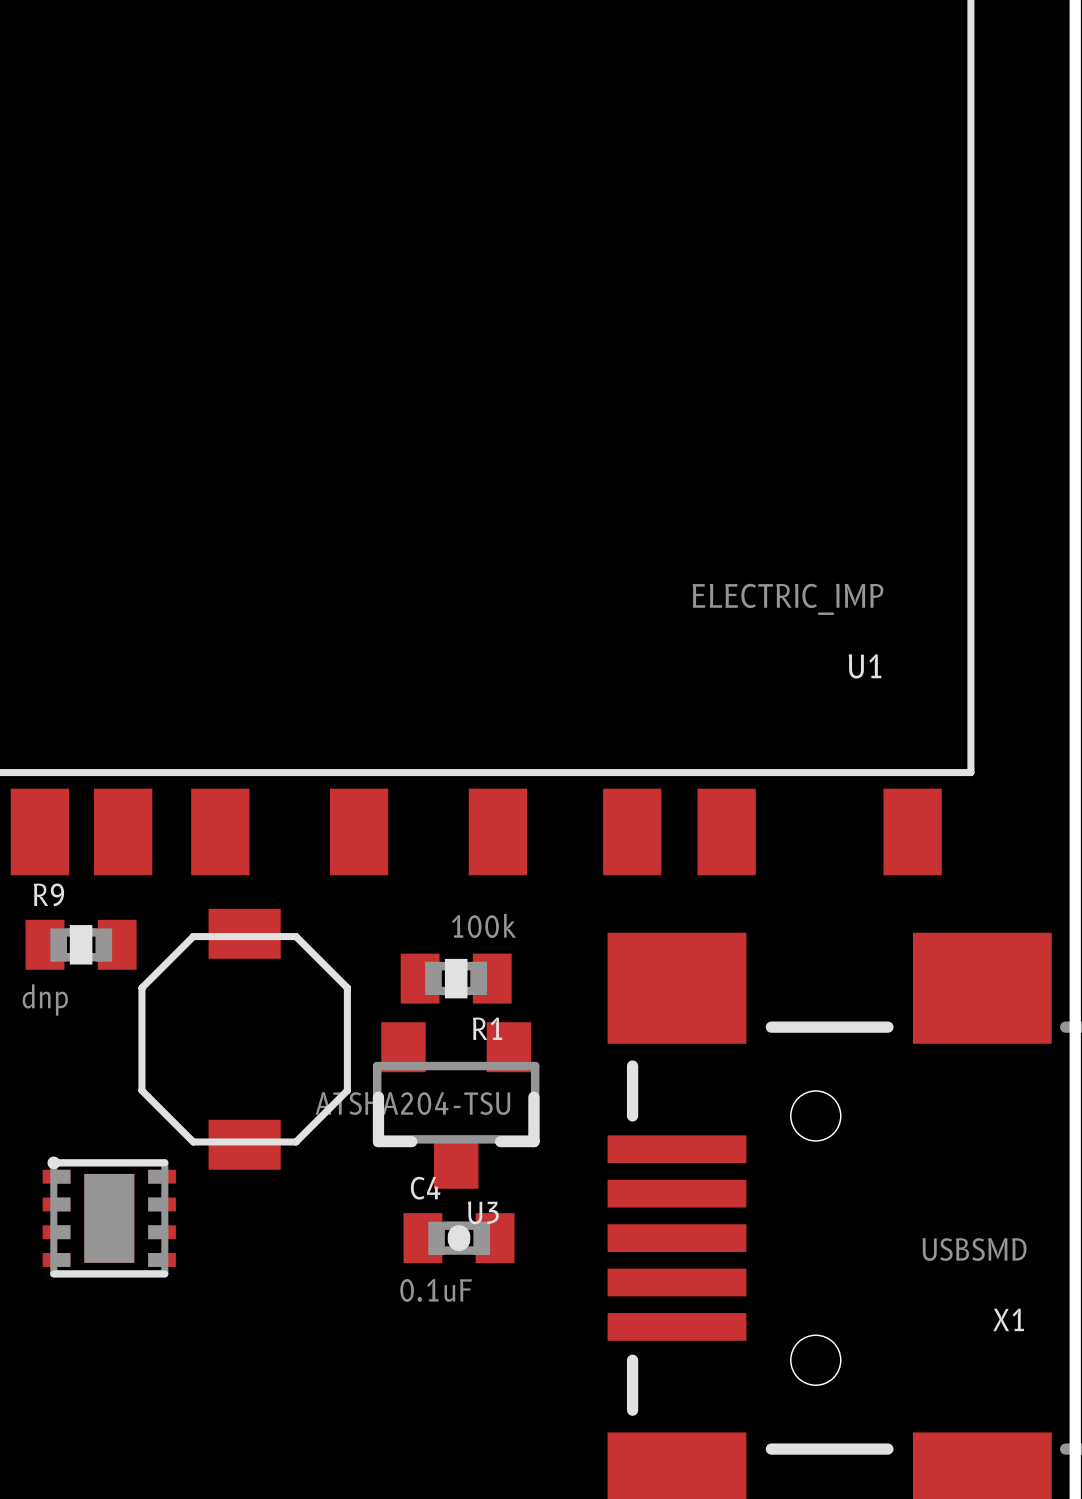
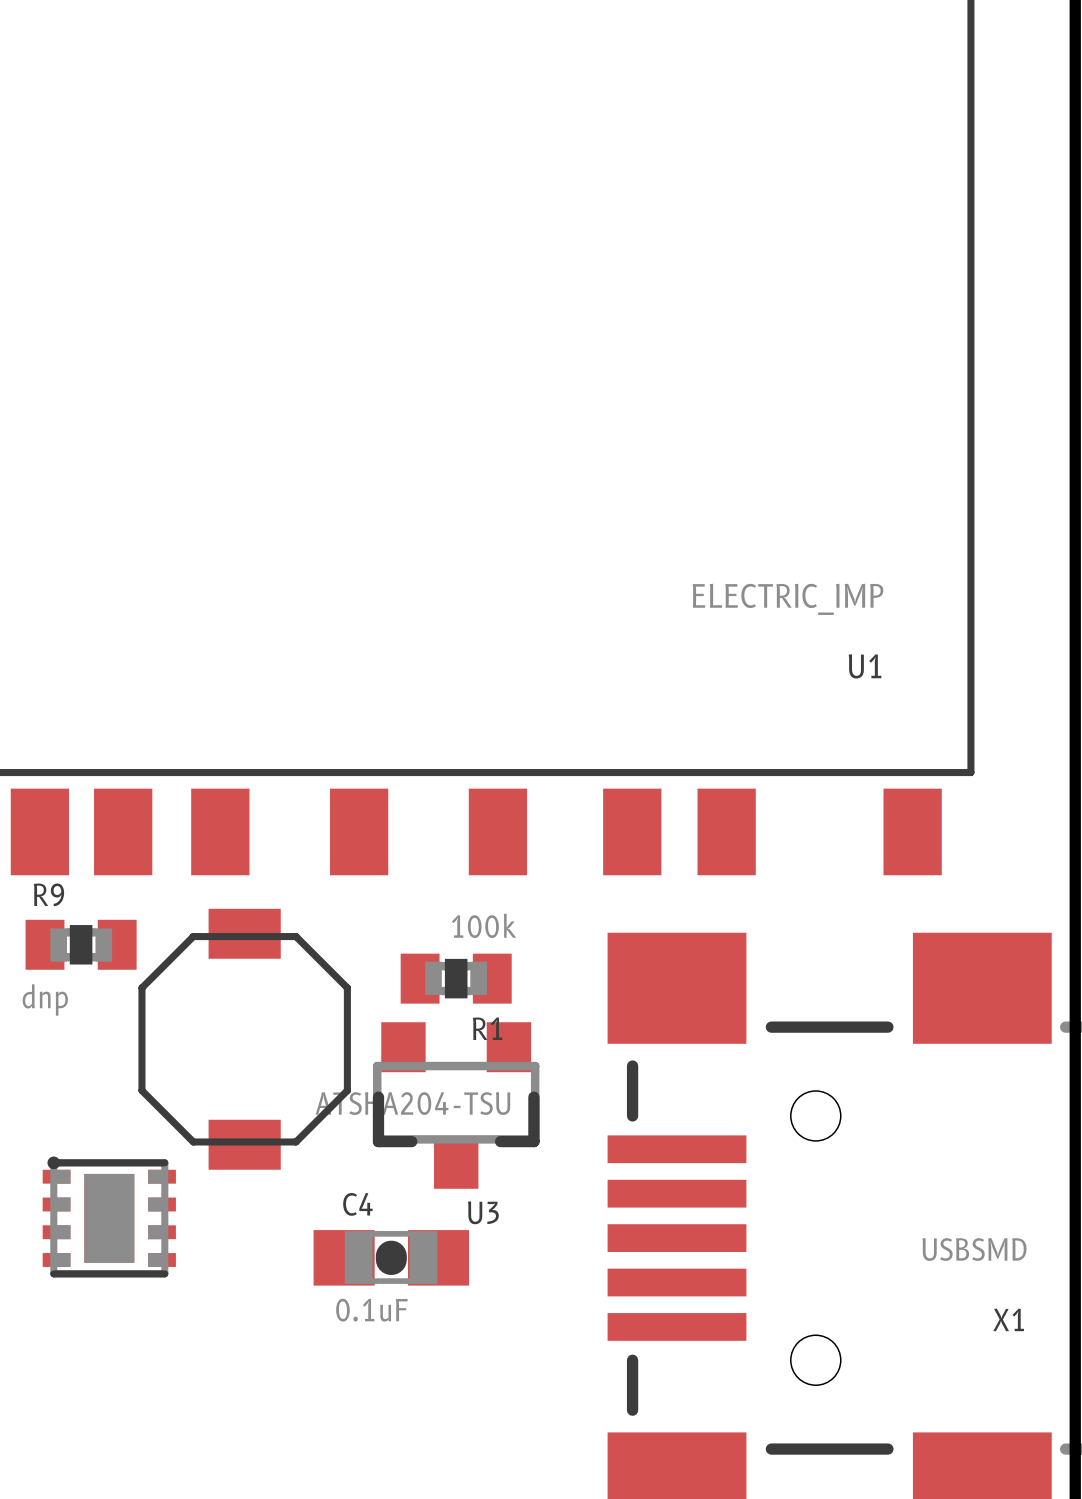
C4 footprint: [403, 1213, 515, 1264] -> [313, 1230, 470, 1286]

